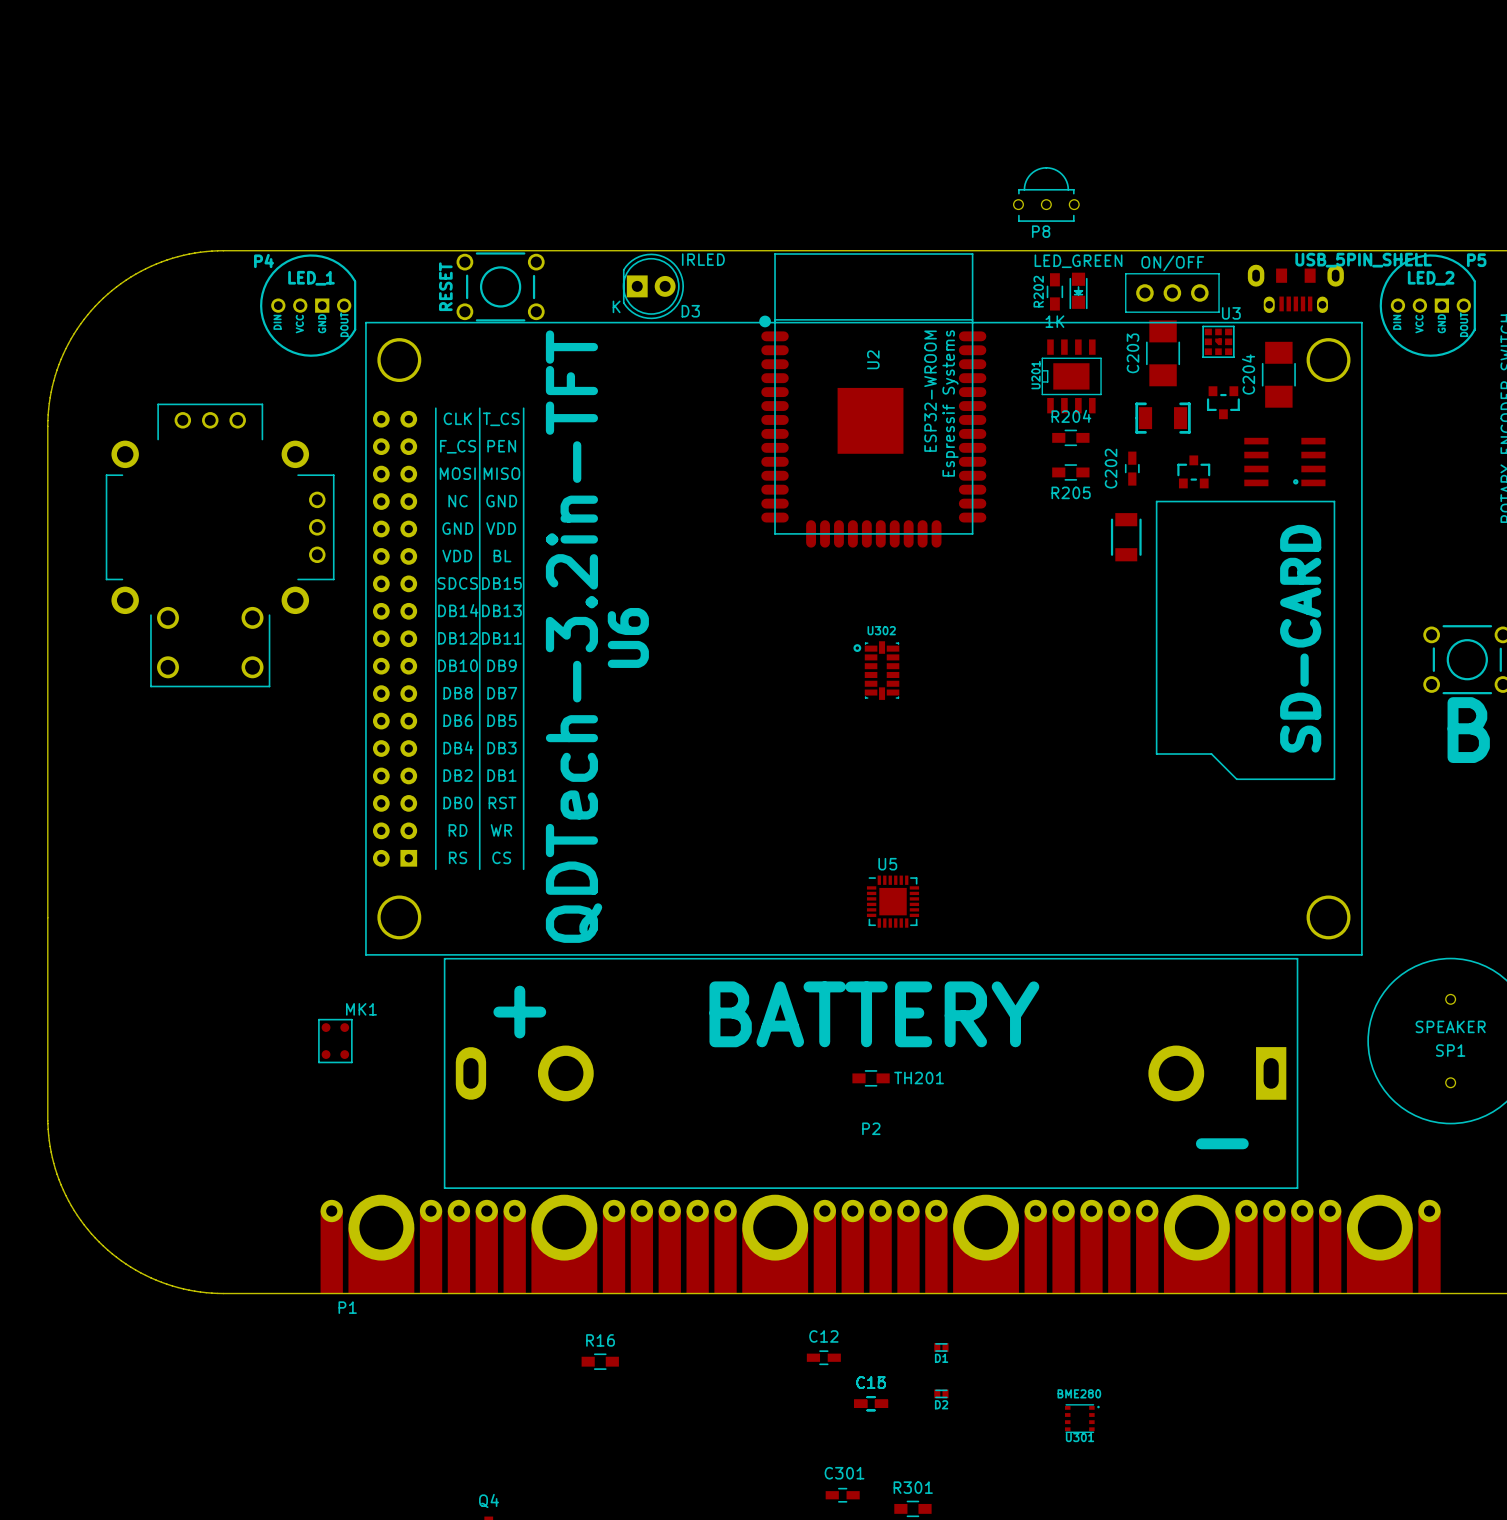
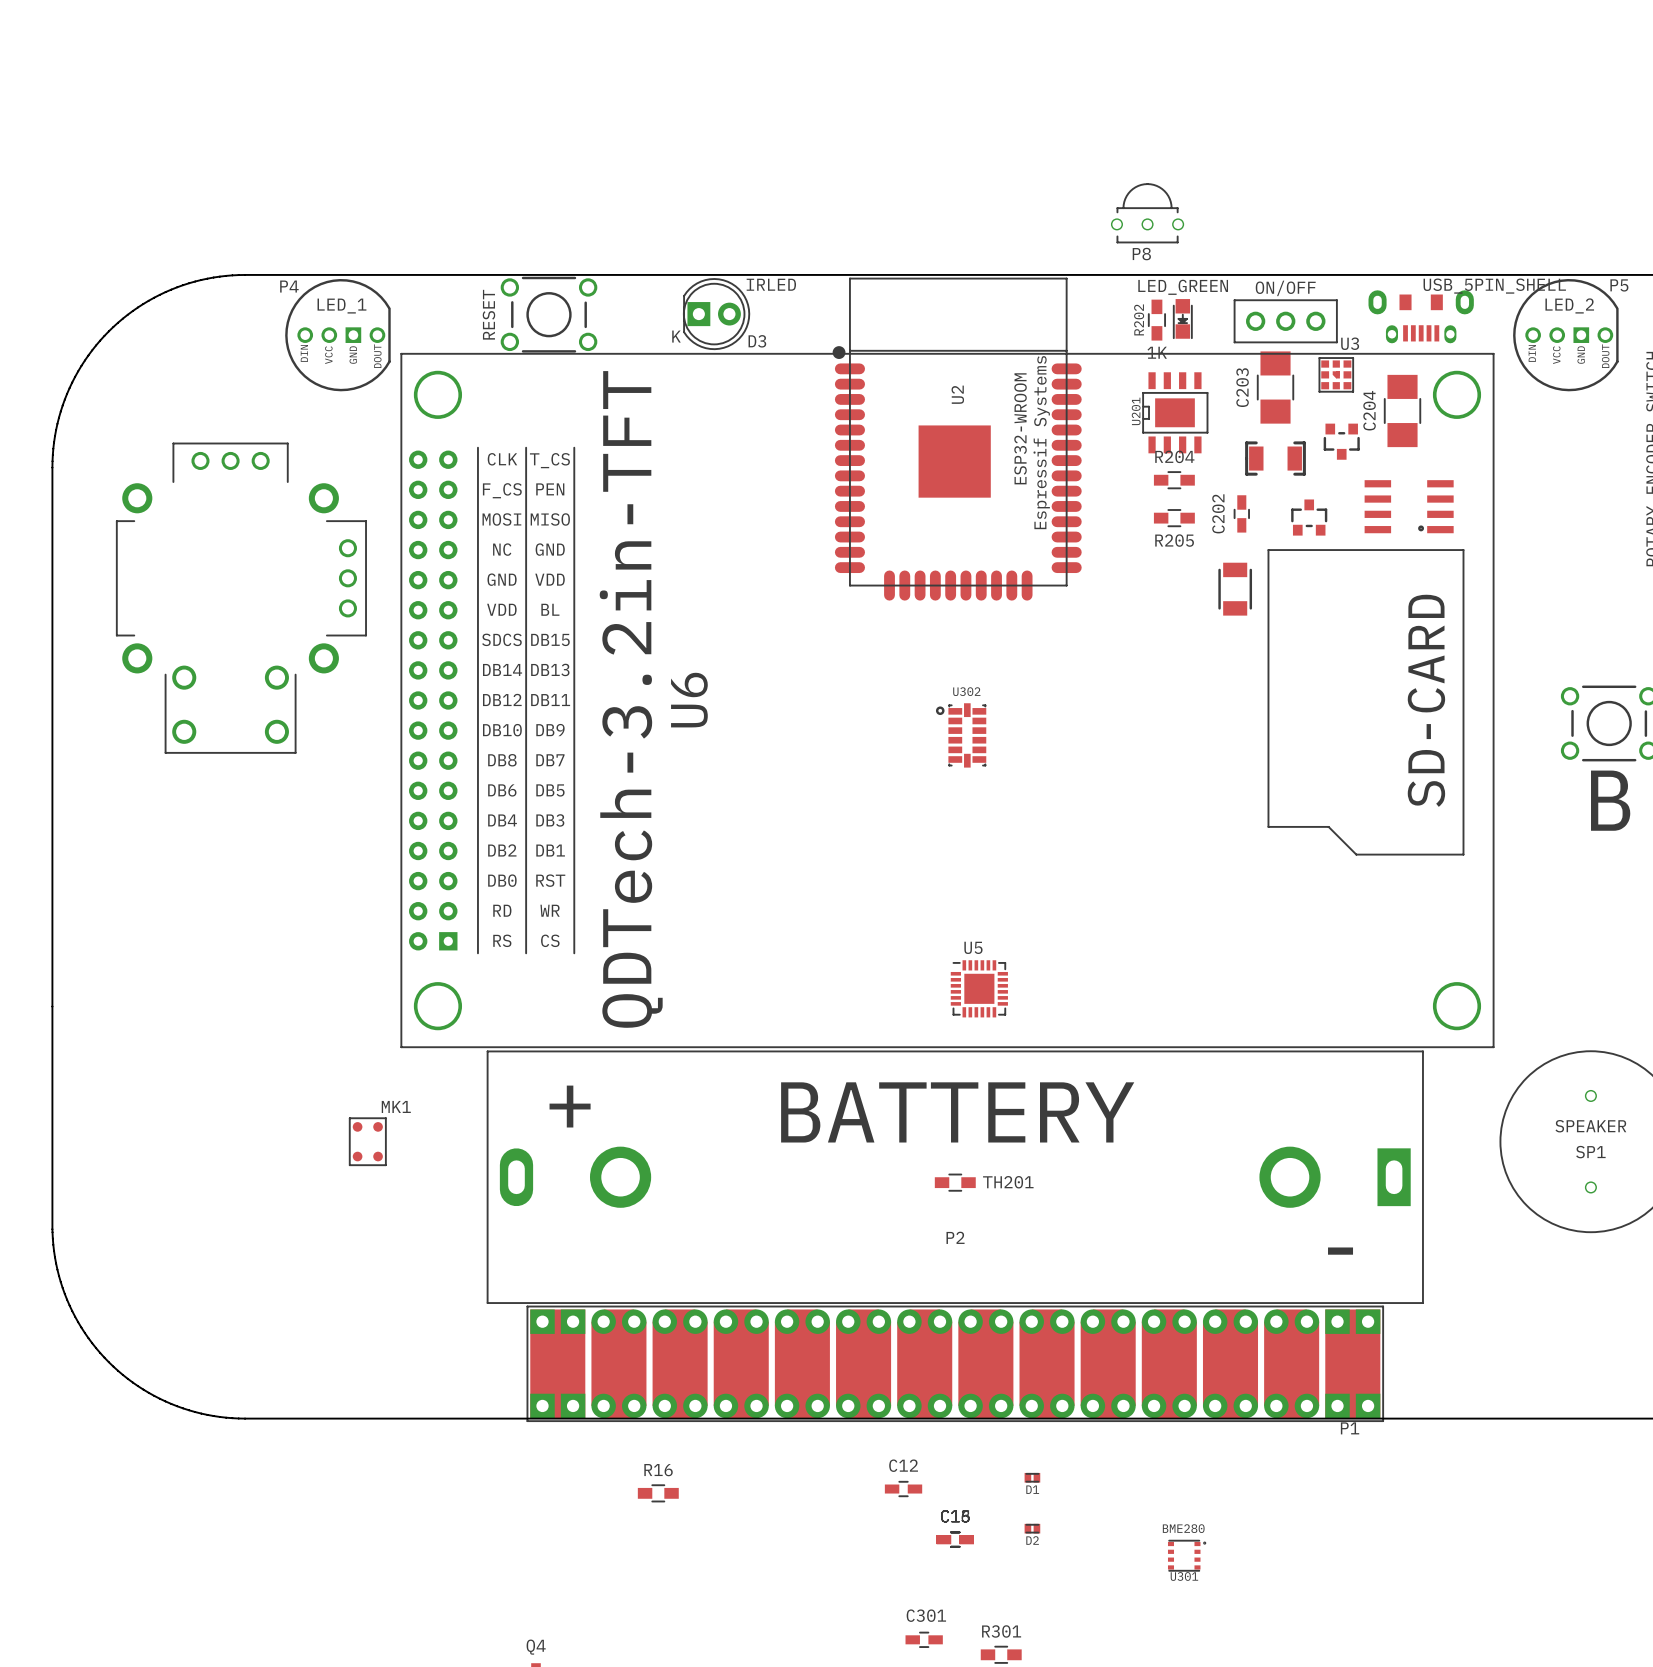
P1 footprint: [320, 1194, 1441, 1294] -> [527, 1306, 1384, 1422]
P1 name position: P1 (347, 1307) -> P1 (1350, 1428)

